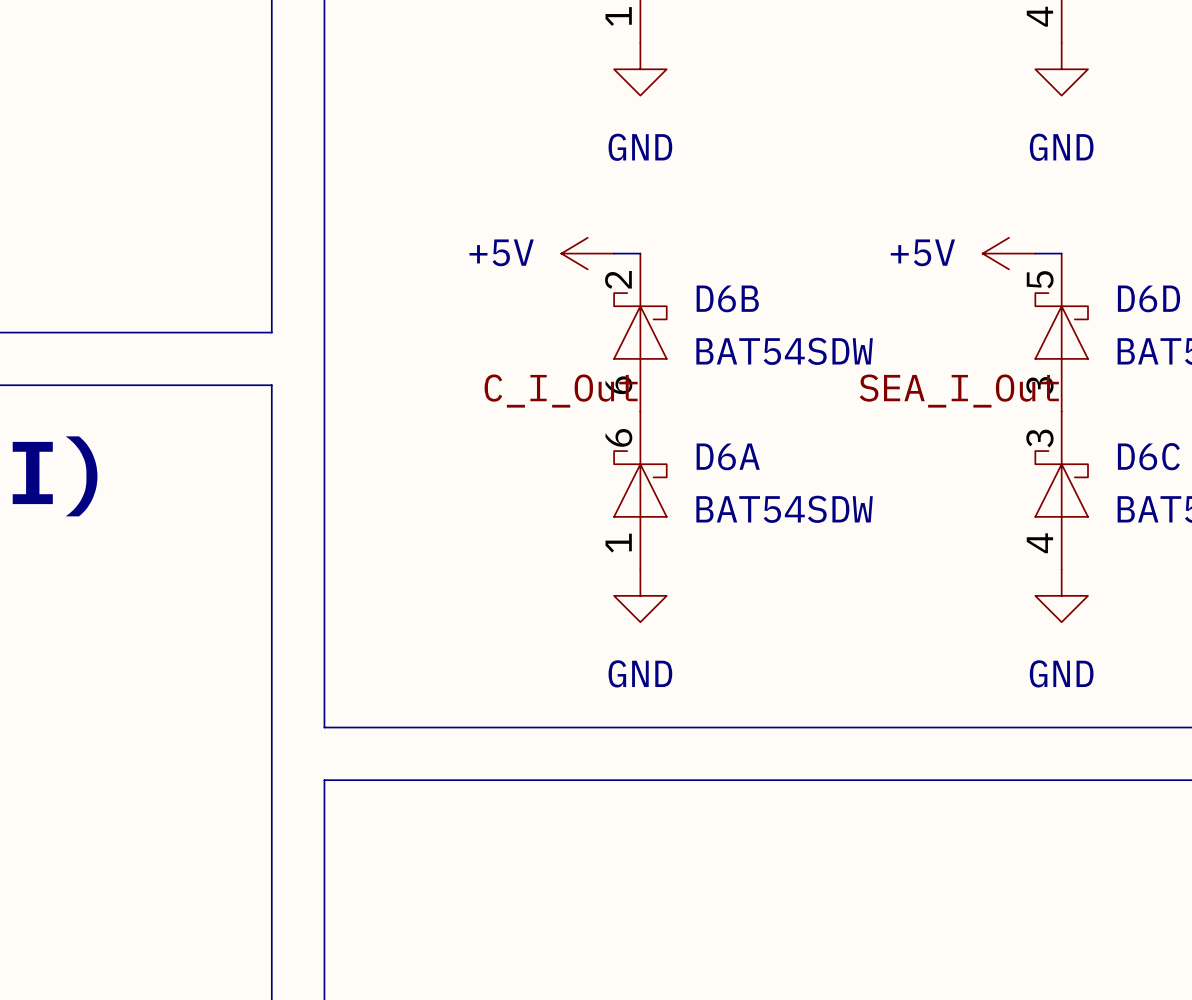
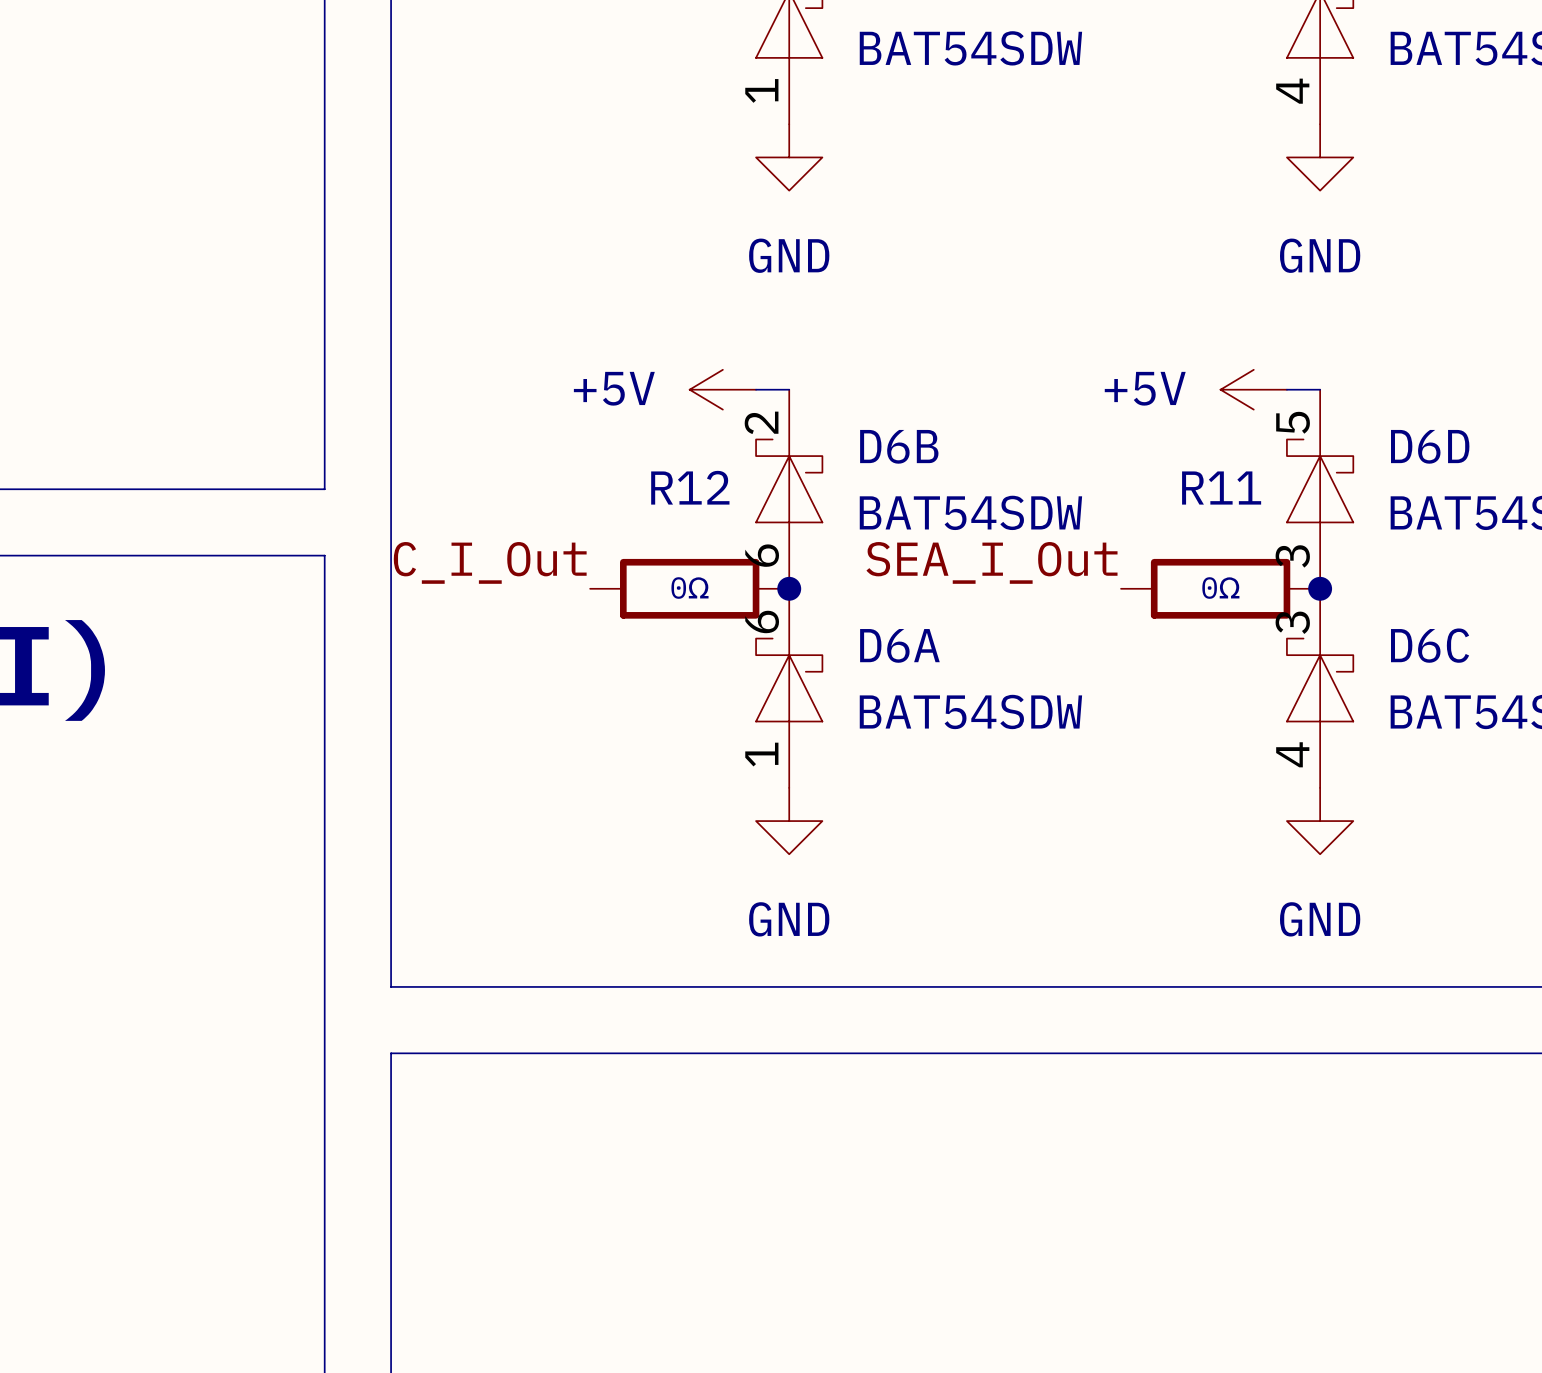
label position: C_I_Out (561, 391) -> C_I_Out (490, 562)
label position: SEA_I_Out (959, 391) -> SEA_I_Out (991, 562)
R12: none -> 0Ω (689, 588)
junction: none -> (789, 588)
R11: none -> 0Ω (1220, 588)
junction: none -> (1320, 588)

